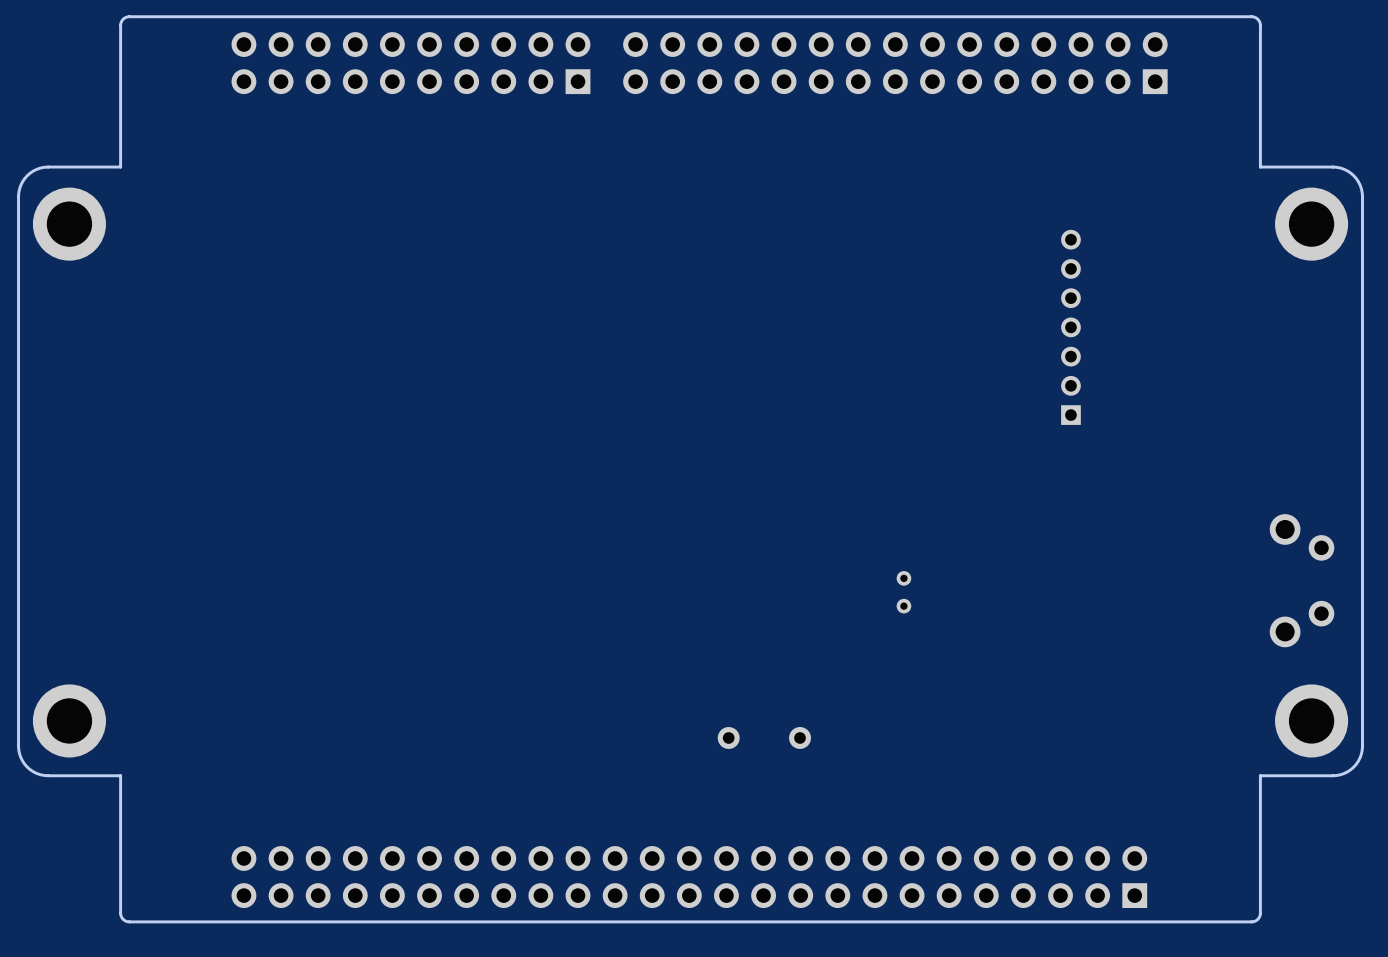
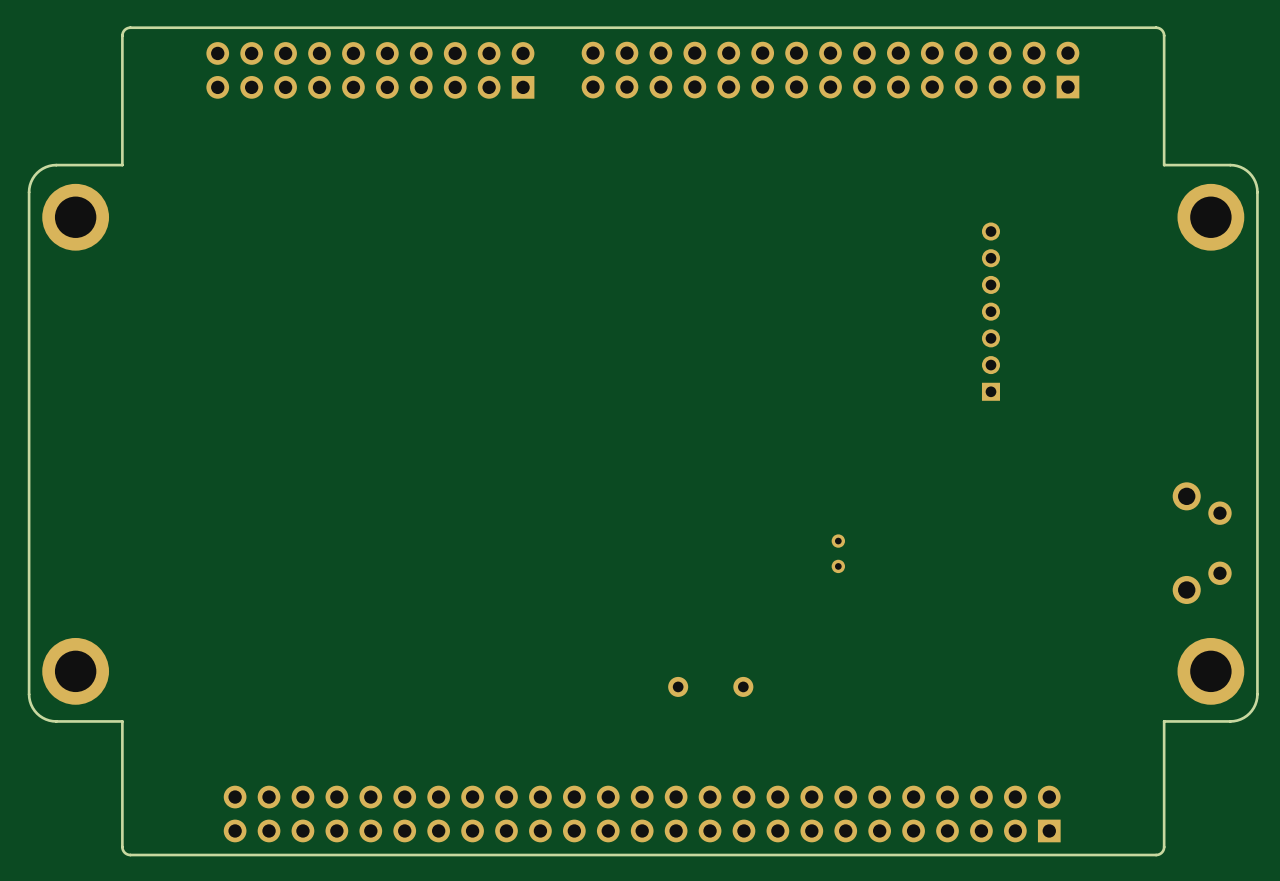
part footprint: [17, 15, 1364, 924] -> [27, 26, 1259, 857]

